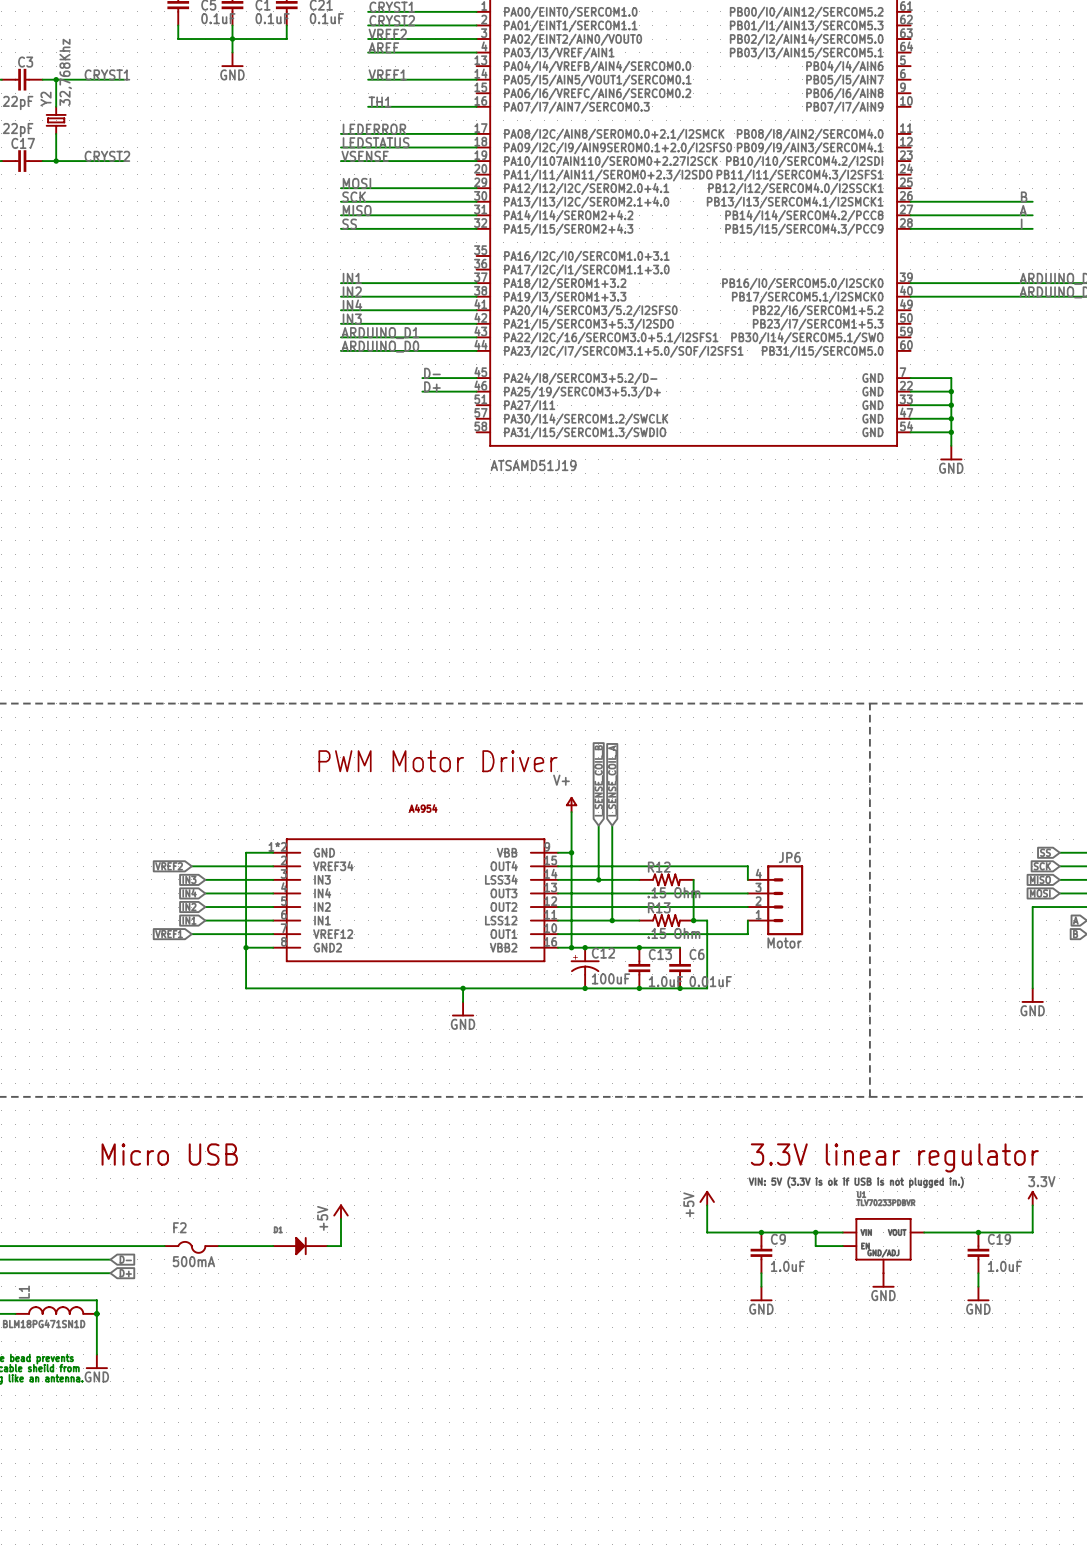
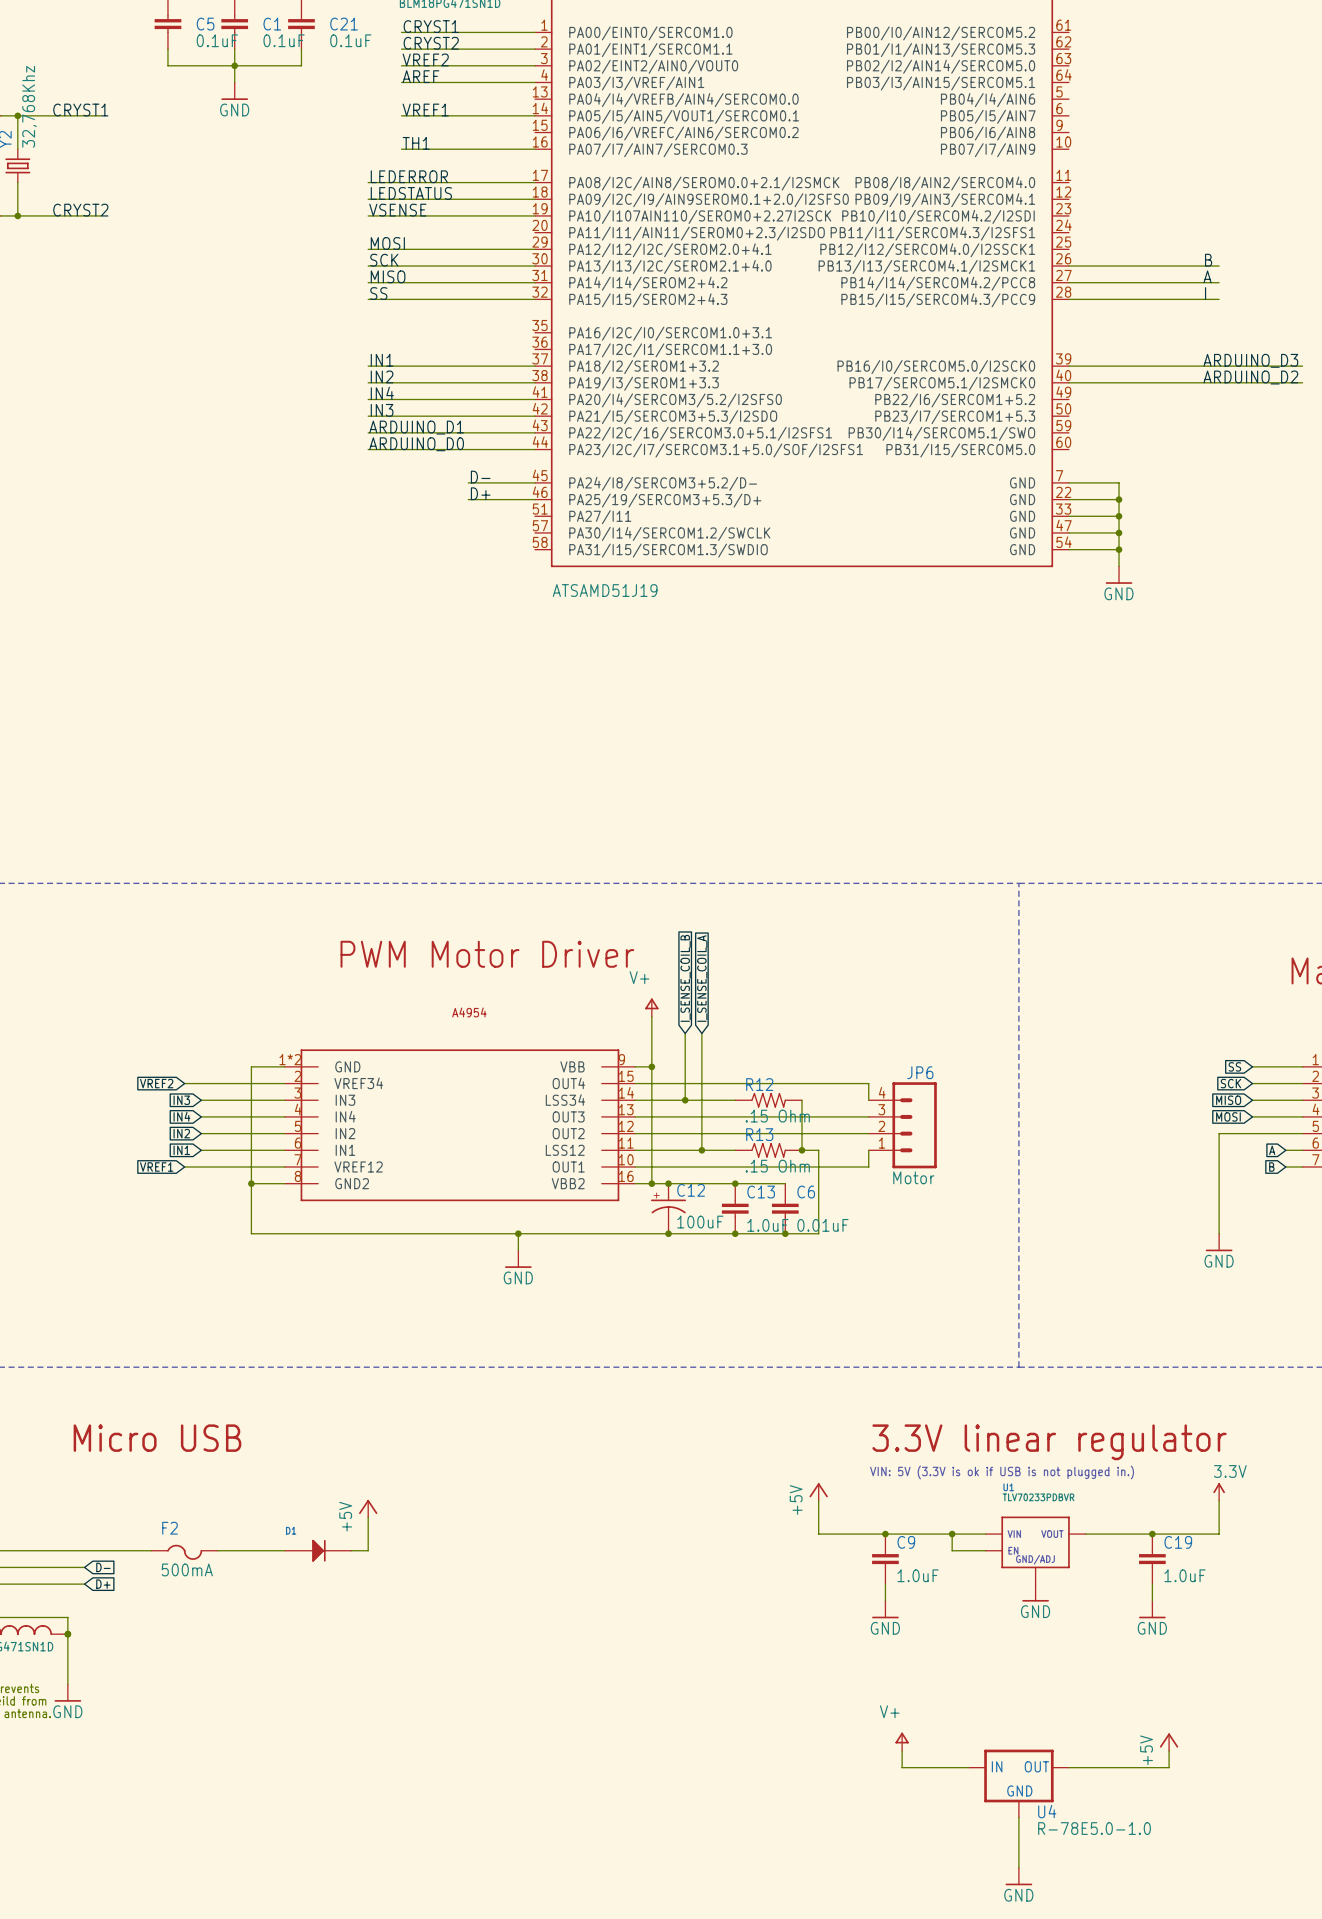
power symbol: none -> V+ (902, 1741)
power symbol: none -> +5V (1169, 1742)
wire: none -> (902, 1750) (902, 1767) (968, 1767)
wire: none -> (1169, 1750) (1169, 1767) (1068, 1767)
U4: none -> R-78E5.0-1.0 (1018, 1783)
wire: none -> (1018, 1817) (1018, 1867)
power symbol: none -> GND (1018, 1876)

